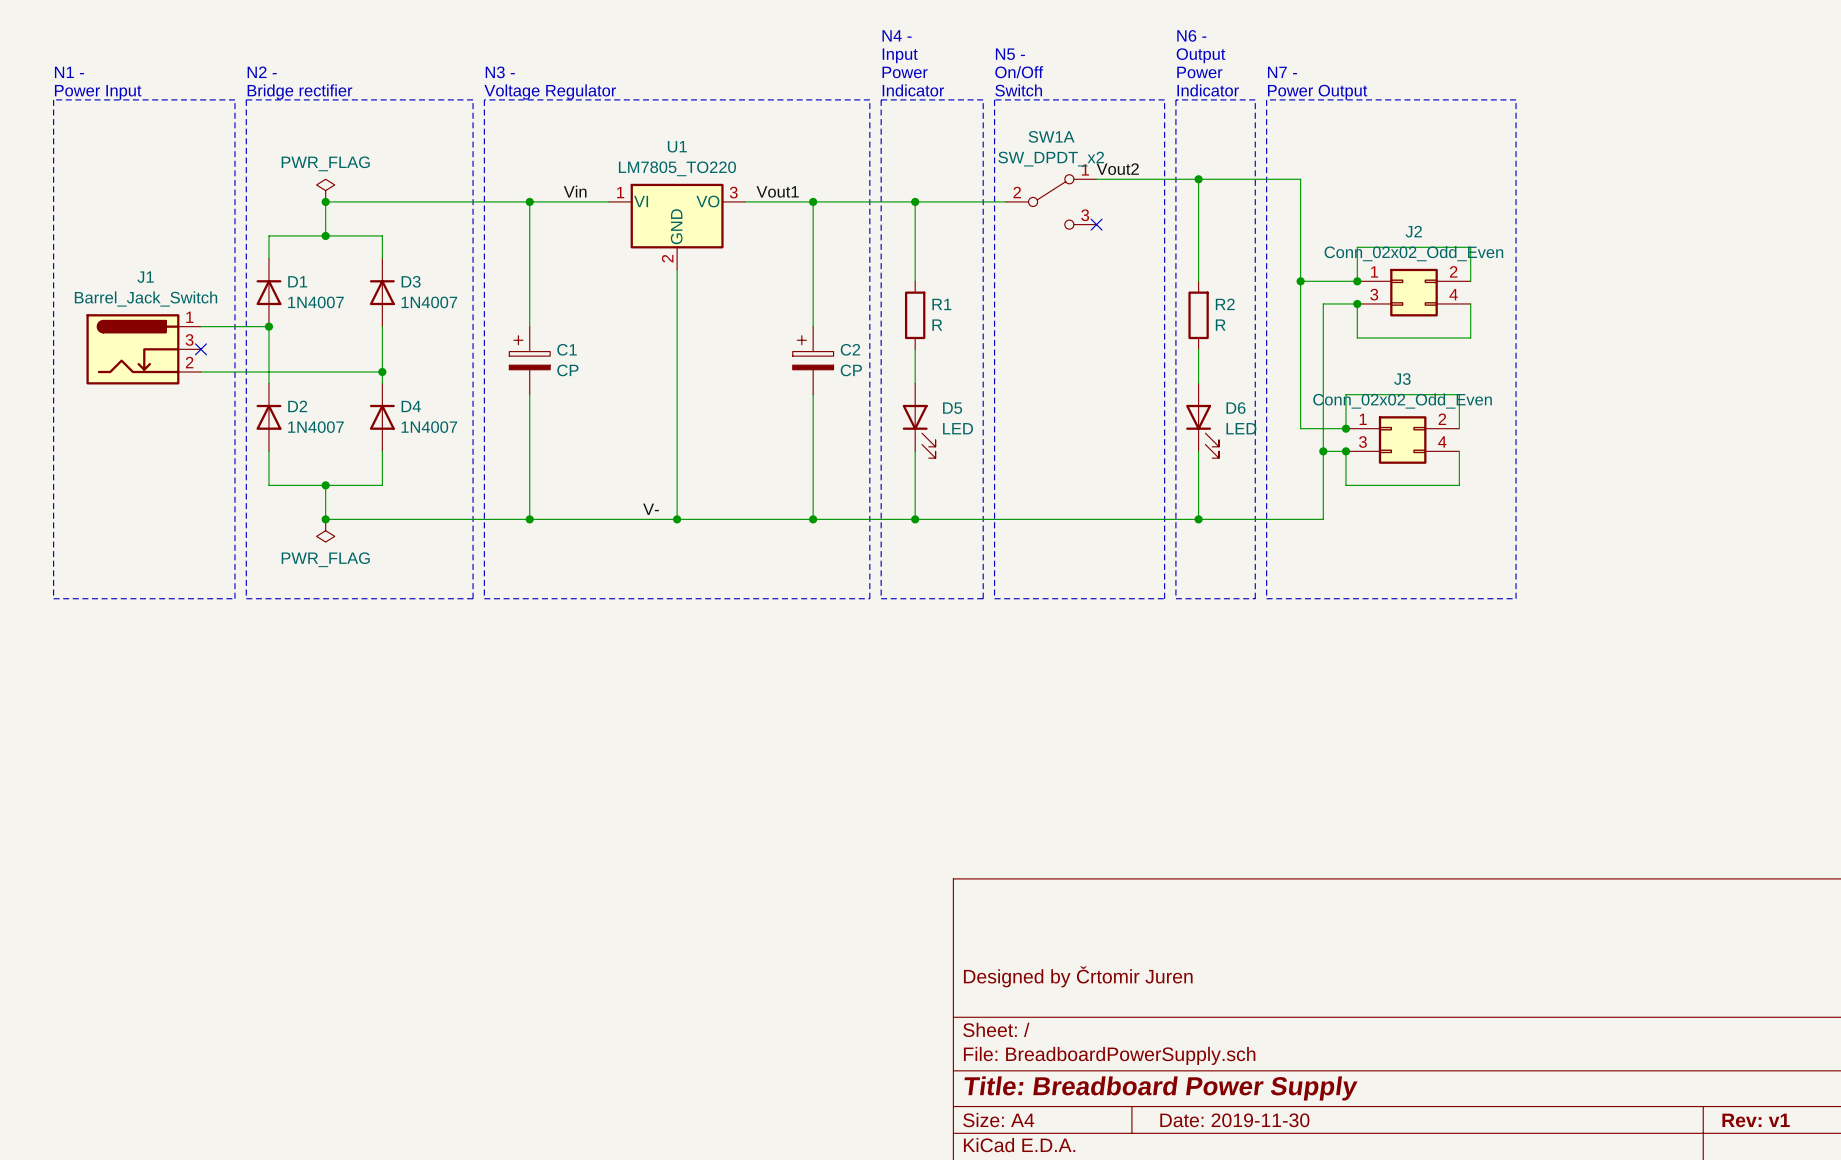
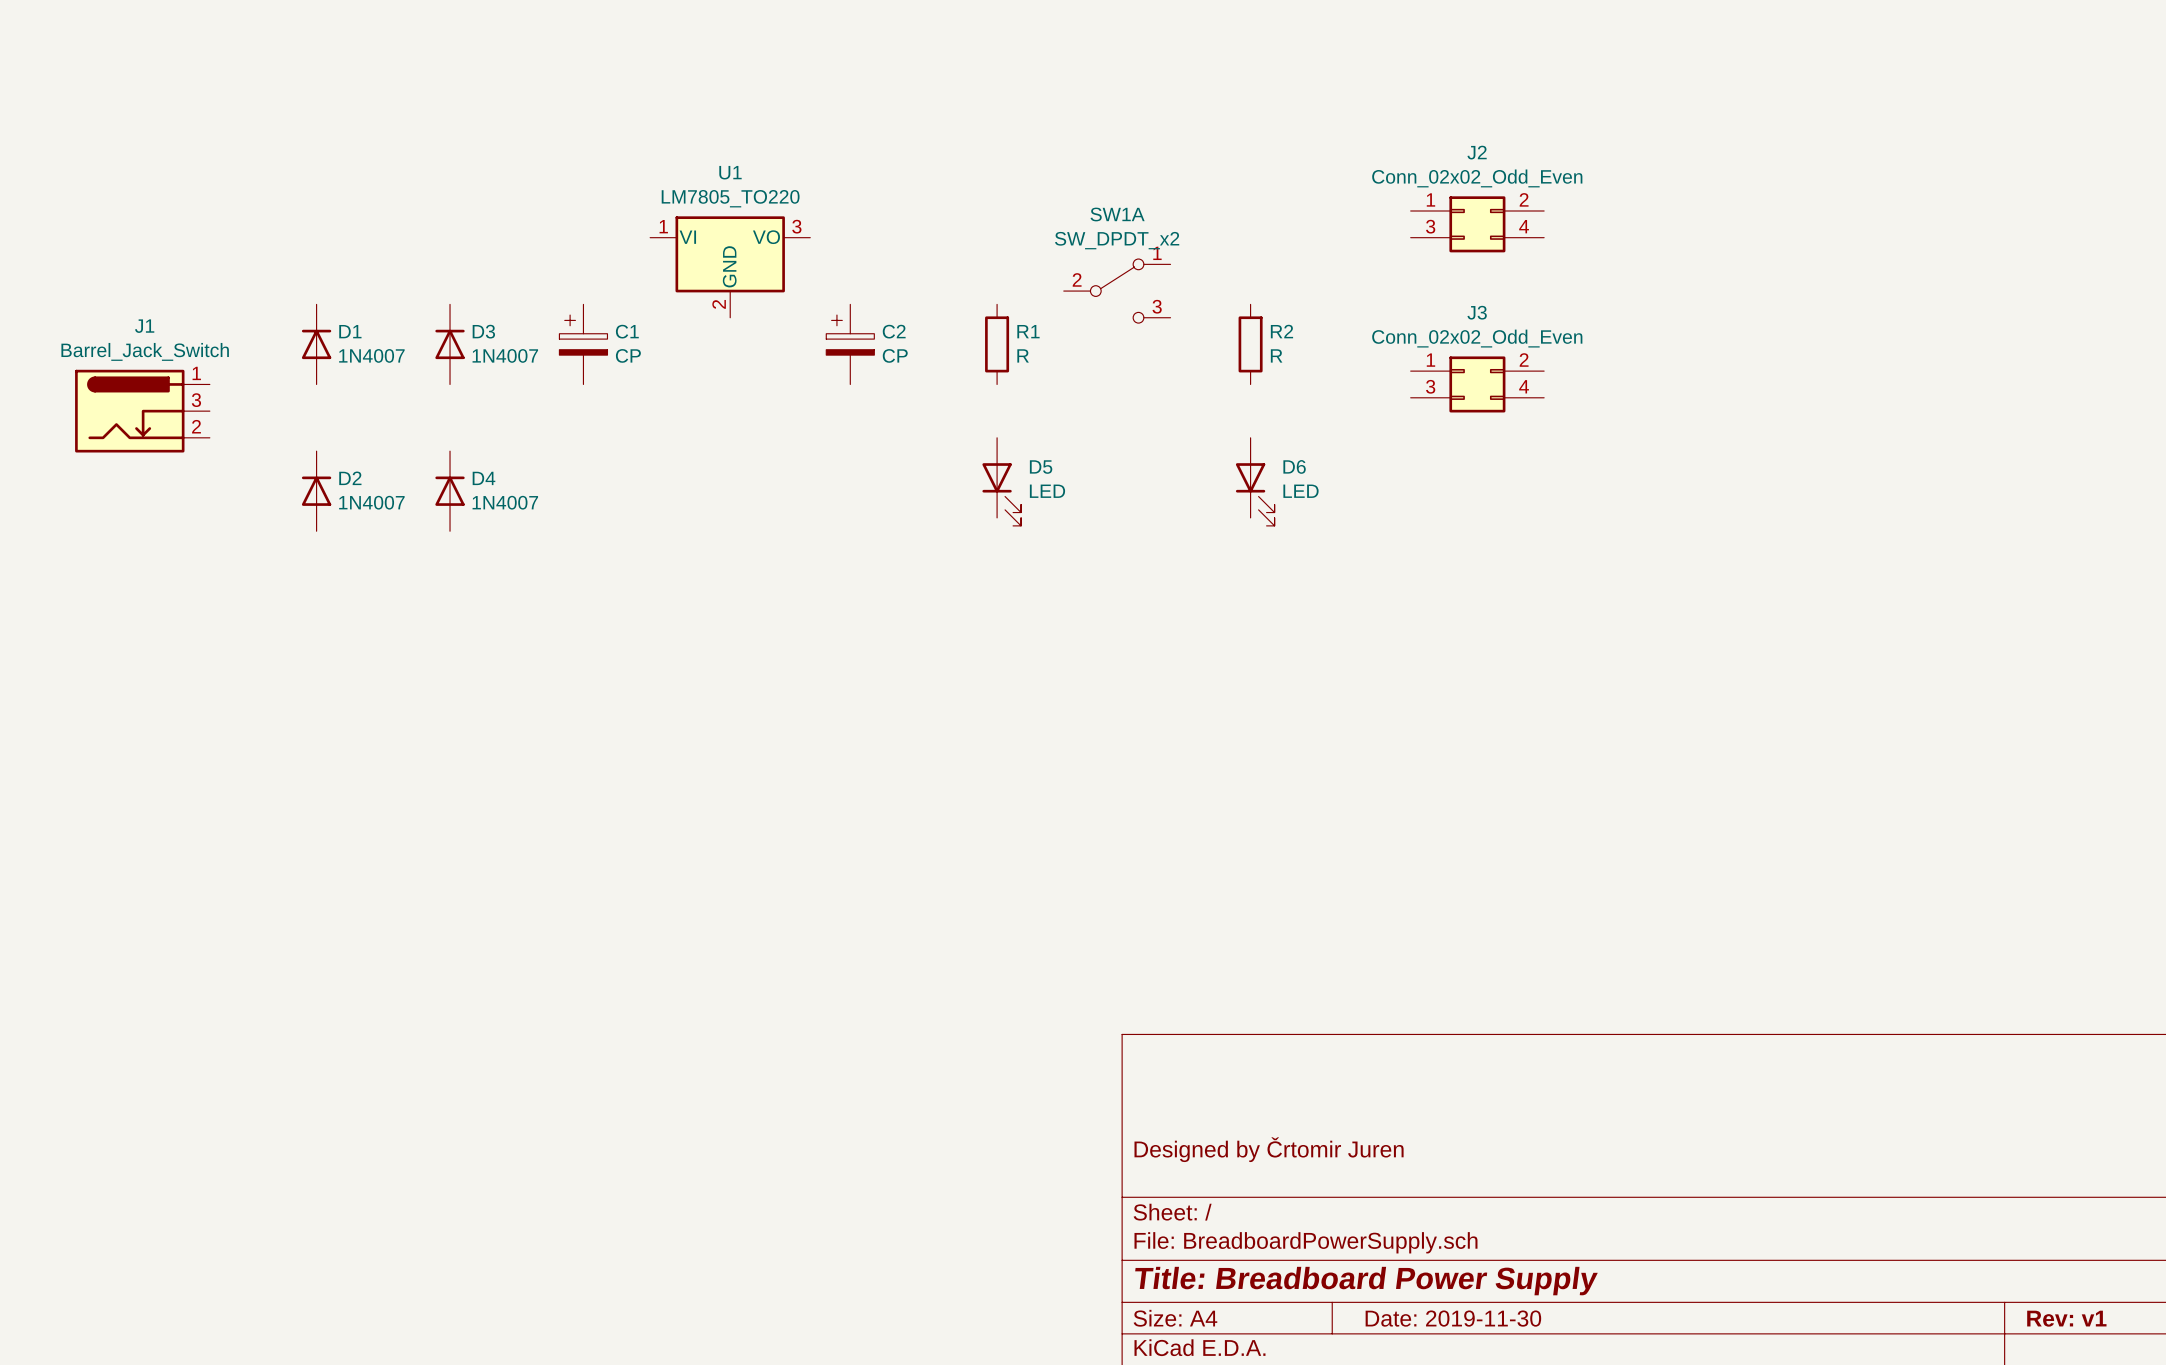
text: N4 - (897, 35) -> none
text: N6 - (1191, 35) -> none
text: N5 - (1010, 54) -> none
text: Input (900, 55) -> none
text: Output (1200, 55) -> none
text: N1 - (69, 72) -> none
text: N2 - (262, 72) -> none
text: N3 - (500, 72) -> none
text: Power (905, 72) -> none
text: On/Off (1019, 72) -> none
text: Power (1199, 72) -> none
text: N7 - (1282, 72) -> none
text: Indicator (913, 90) -> none
text: Switch (1018, 90) -> none
text: Indicator (1208, 90) -> none
text: Power Input (98, 92) -> none
text: Bridge rectifier (299, 92) -> none
text: Voltage Regulator (550, 92) -> none
text: Power Output (1317, 92) -> none
line: (53, 99) (53, 598) (234, 598) (234, 99) (53, 99) -> none
line: (246, 99) (473, 99) (473, 598) (246, 598) (246, 99) -> none
line: (484, 99) (869, 99) (869, 598) (484, 598) (484, 99) -> none
line: (881, 99) (983, 99) (983, 598) (881, 598) (881, 99) -> none
line: (994, 99) (1164, 99) (1164, 598) (994, 598) (994, 99) -> none
line: (1175, 99) (1255, 99) (1255, 598) (1175, 598) (1175, 99) -> none
line: (1266, 99) (1516, 99) (1516, 598) (1266, 598) (1266, 99) -> none
label: Vout2 (1117, 169) -> none
wire: (1096, 179) (1300, 179) (1300, 428) (1345, 428) (1345, 394) (1459, 394) (1459, 428) -> none
wire: (1198, 179) (1198, 281) -> none
junction: (1198, 179) -> none
power symbol: PWR_FLAG (325, 190) -> none
label: Vin (575, 191) -> none
label: Vout1 (777, 191) -> none
junction: (325, 201) -> none
wire: (529, 201) (529, 326) -> none
junction: (529, 201) -> none
wire: (609, 201) (325, 201) (325, 235) -> none
wire: (745, 201) (1005, 201) -> none
wire: (813, 201) (813, 326) -> none
junction: (813, 201) -> none
wire: (915, 201) (915, 281) -> none
junction: (915, 201) -> none
SW1A position: (1051, 201) -> (1117, 291)
no-connect mark: (1096, 224) -> none
U1 position: (677, 226) -> (730, 267)
junction: (325, 235) -> none
wire: (268, 258) (268, 235) (382, 235) (382, 258) -> none
wire: (677, 269) (677, 519) -> none
wire: (1300, 281) (1357, 281) (1357, 247) (1470, 247) (1470, 281) -> none
junction: (1300, 281) -> none
junction: (1357, 281) -> none
J2 position: (1414, 292) -> (1477, 224)
junction: (1357, 303) -> none
wire: (1470, 303) (1470, 337) (1357, 337) (1357, 303) (1323, 303) (1323, 519) (325, 519) (325, 485) -> none
R1 position: (915, 315) -> (997, 344)
R2 position: (1198, 315) -> (1250, 344)
wire: (200, 326) (268, 326) (268, 383) -> none
junction: (268, 326) -> none
wire: (382, 326) (382, 383) -> none
J1 position: (143, 349) -> (142, 411)
no-connect mark: (200, 349) -> none
wire: (915, 349) (915, 383) -> none
wire: (1198, 349) (1198, 383) -> none
C1 position: (529, 360) -> (583, 344)
C2 position: (813, 360) -> (850, 344)
wire: (200, 372) (382, 372) -> none
junction: (382, 372) -> none
wire: (529, 394) (529, 519) -> none
wire: (813, 394) (813, 519) -> none
D5 position: (919, 420) -> (1001, 481)
D6 position: (1202, 420) -> (1255, 481)
junction: (1345, 428) -> none
J3 position: (1402, 440) -> (1477, 384)
wire: (268, 451) (268, 485) (382, 485) (382, 451) -> none
wire: (915, 451) (915, 519) -> none
wire: (1198, 451) (1198, 519) -> none
wire: (1323, 451) (1345, 451) (1345, 485) (1459, 485) (1459, 451) -> none
junction: (1323, 451) -> none
junction: (1345, 451) -> none
junction: (325, 485) -> none
label: V- (651, 509) -> none
junction: (325, 519) -> none
junction: (529, 519) -> none
junction: (677, 519) -> none
junction: (813, 519) -> none
junction: (915, 519) -> none
junction: (1198, 519) -> none
power symbol: PWR_FLAG (325, 530) -> none

